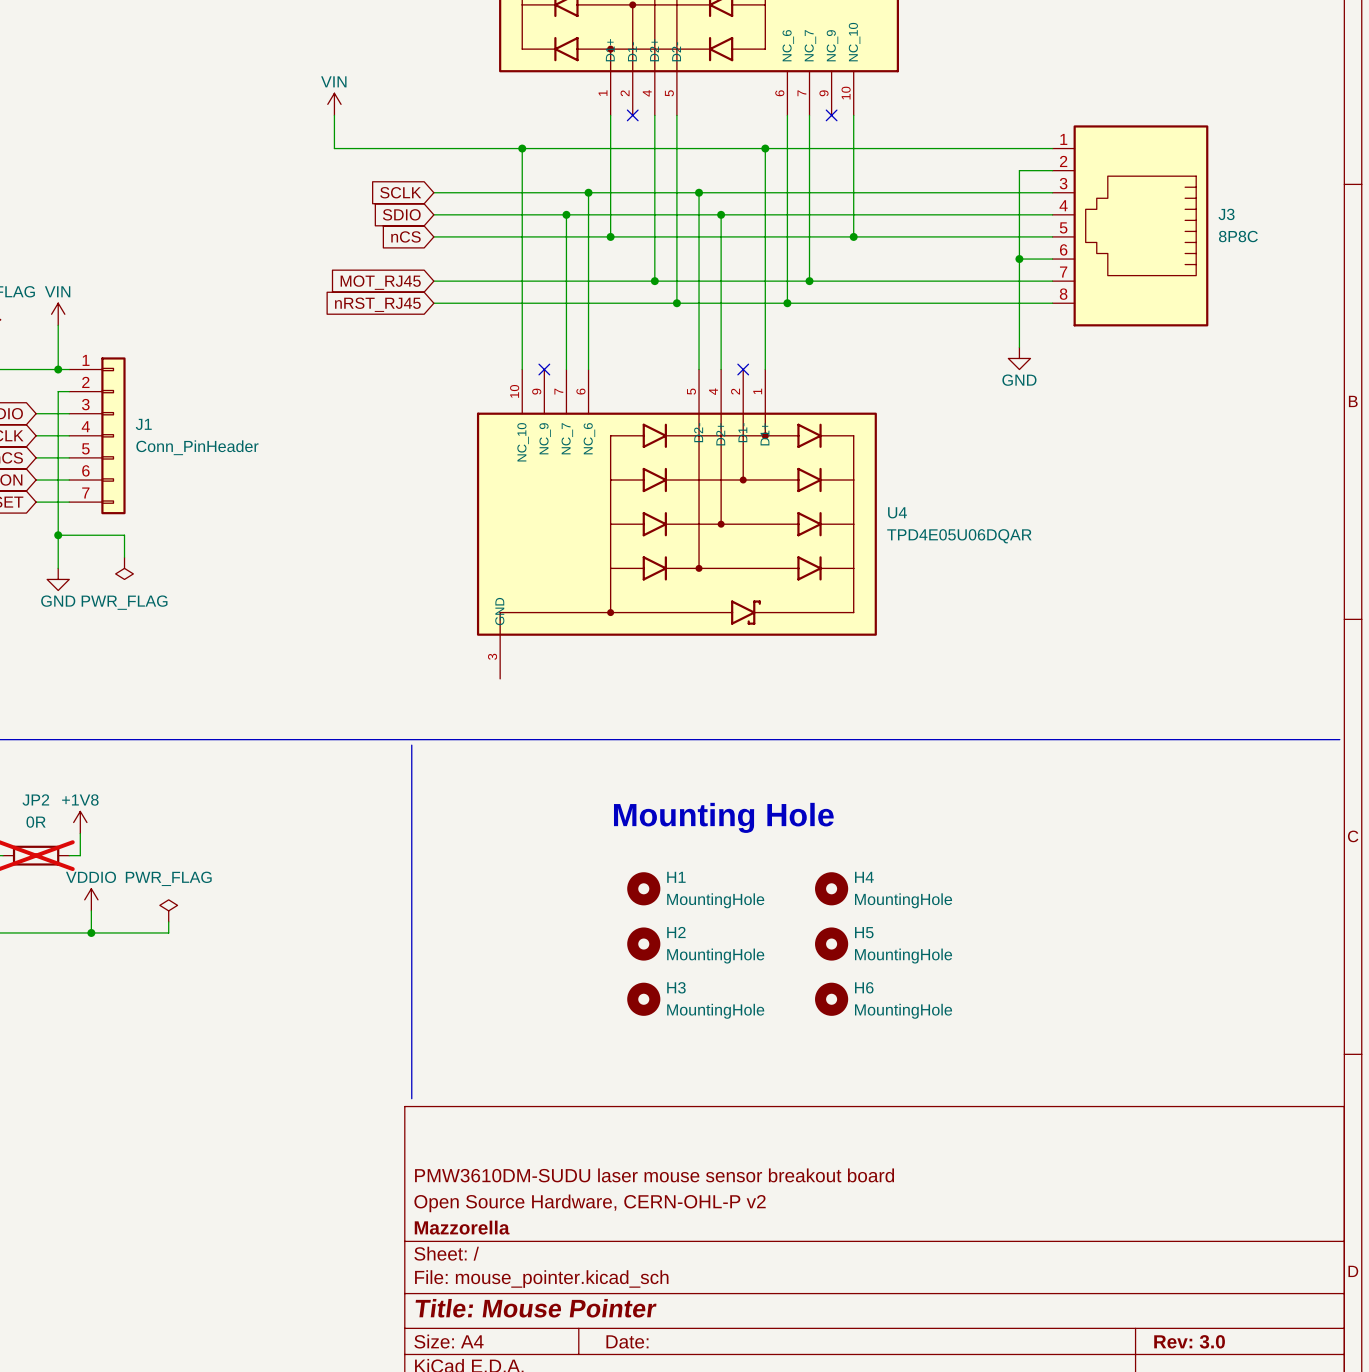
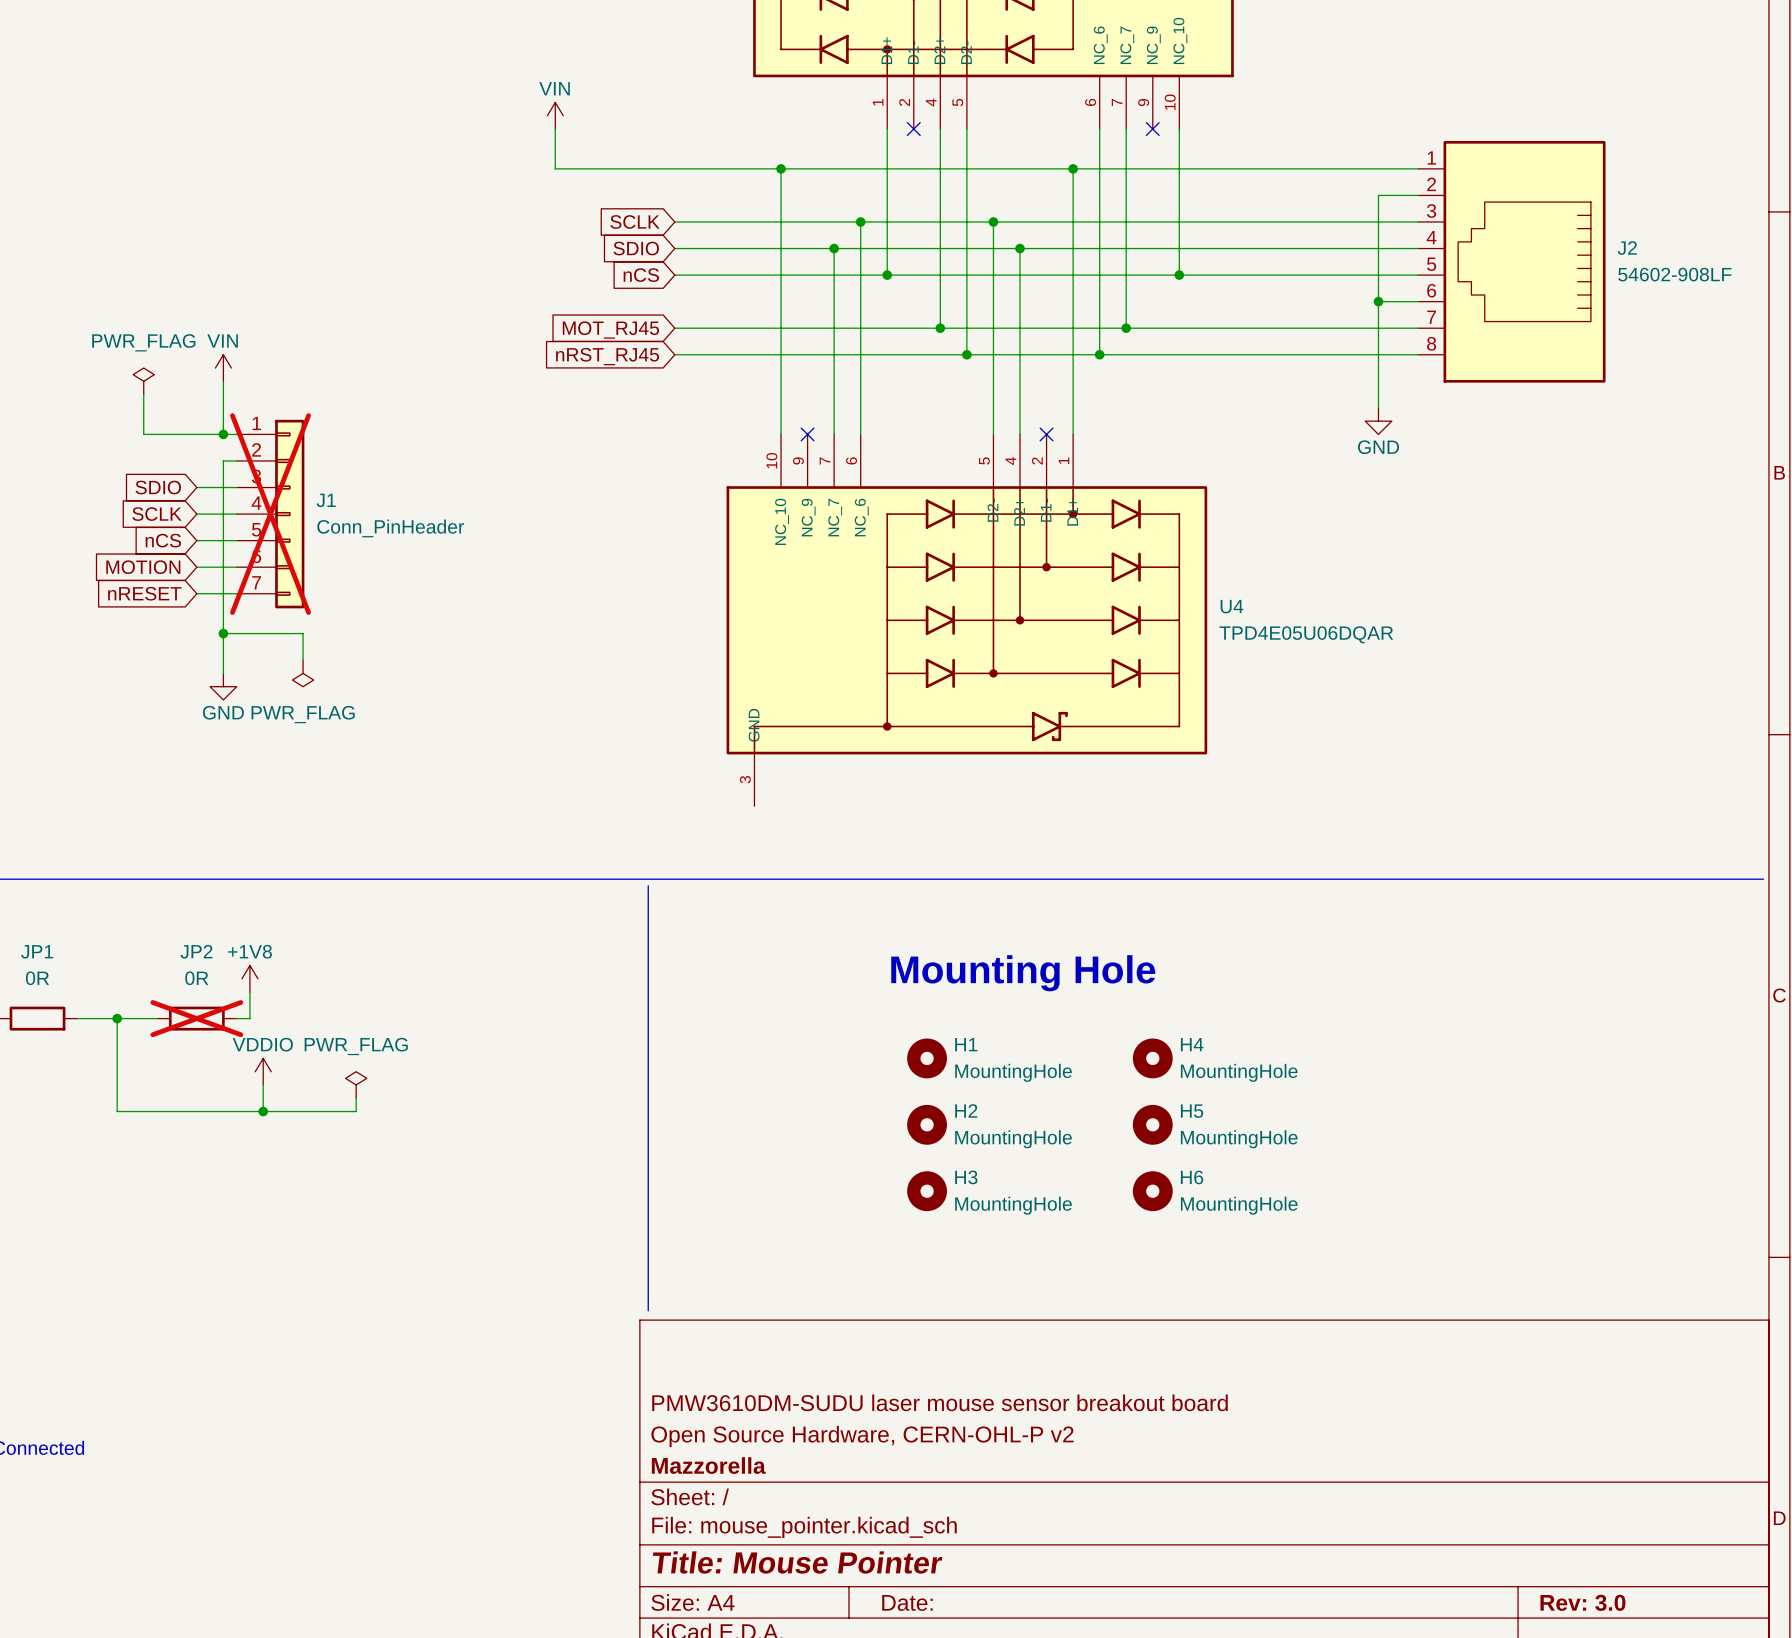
J3 name: J3 (1226, 214) -> J2 (1627, 248)
J3 value: 8P8C (1238, 236) -> 54602-908LF (1674, 274)
J1 do-not-place cross: none -> (270, 514)

